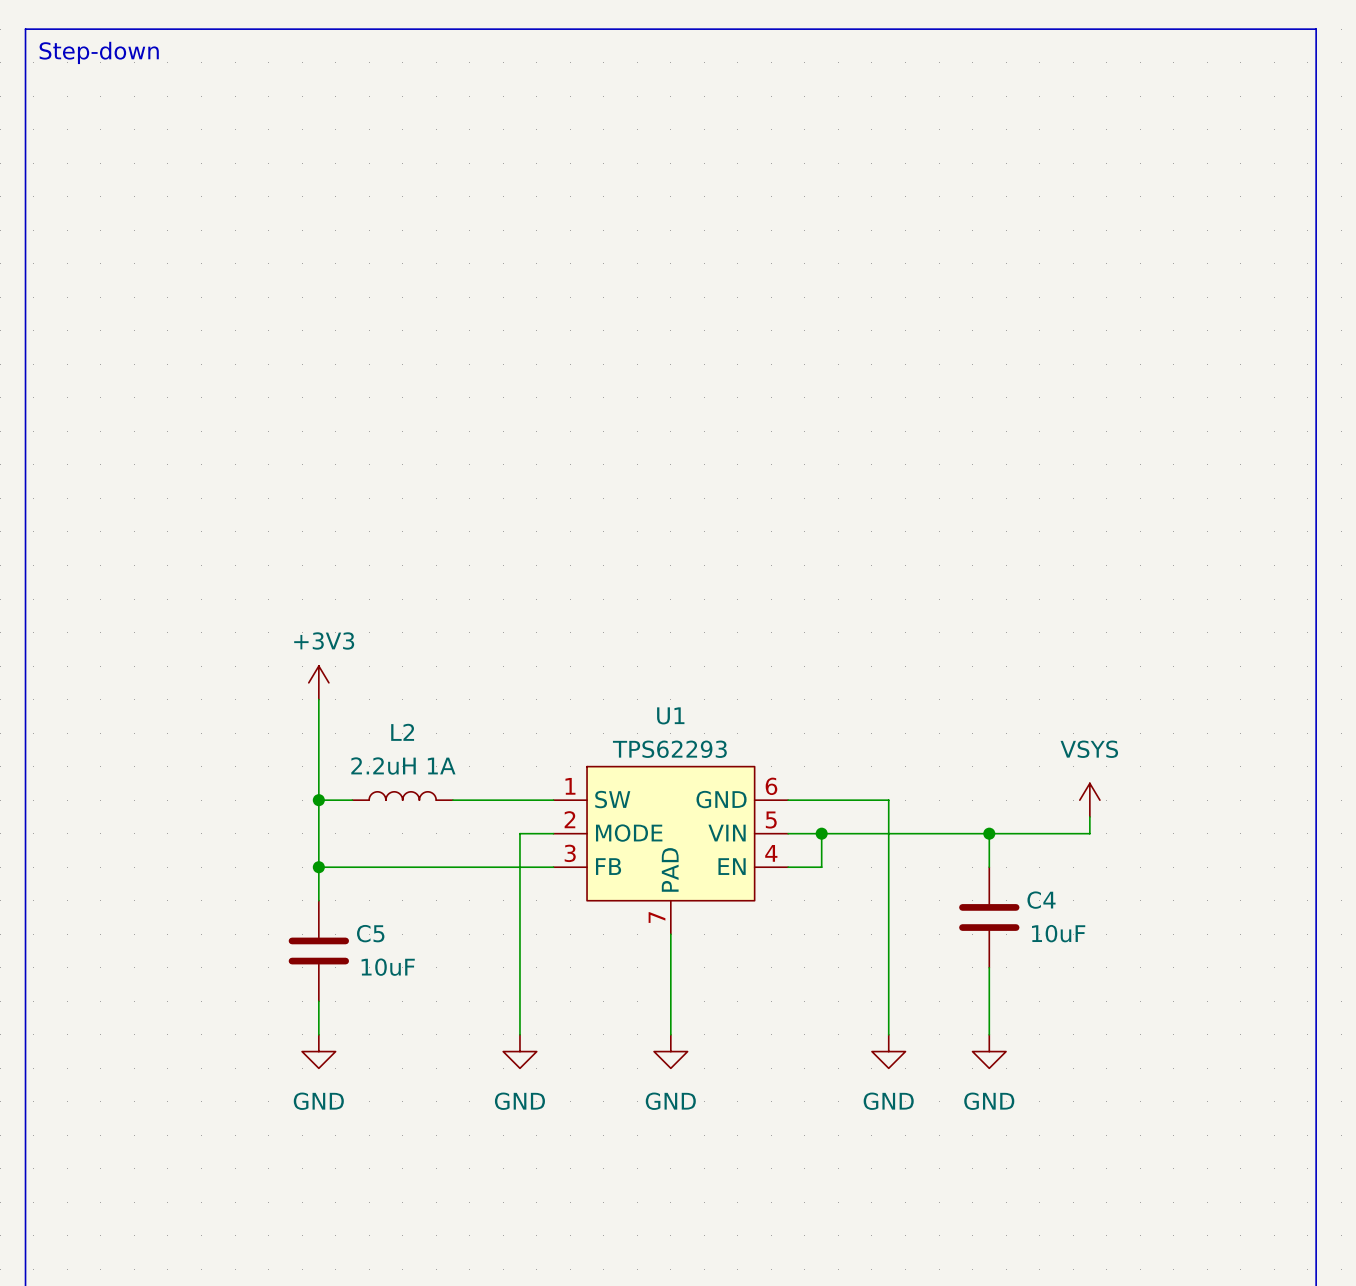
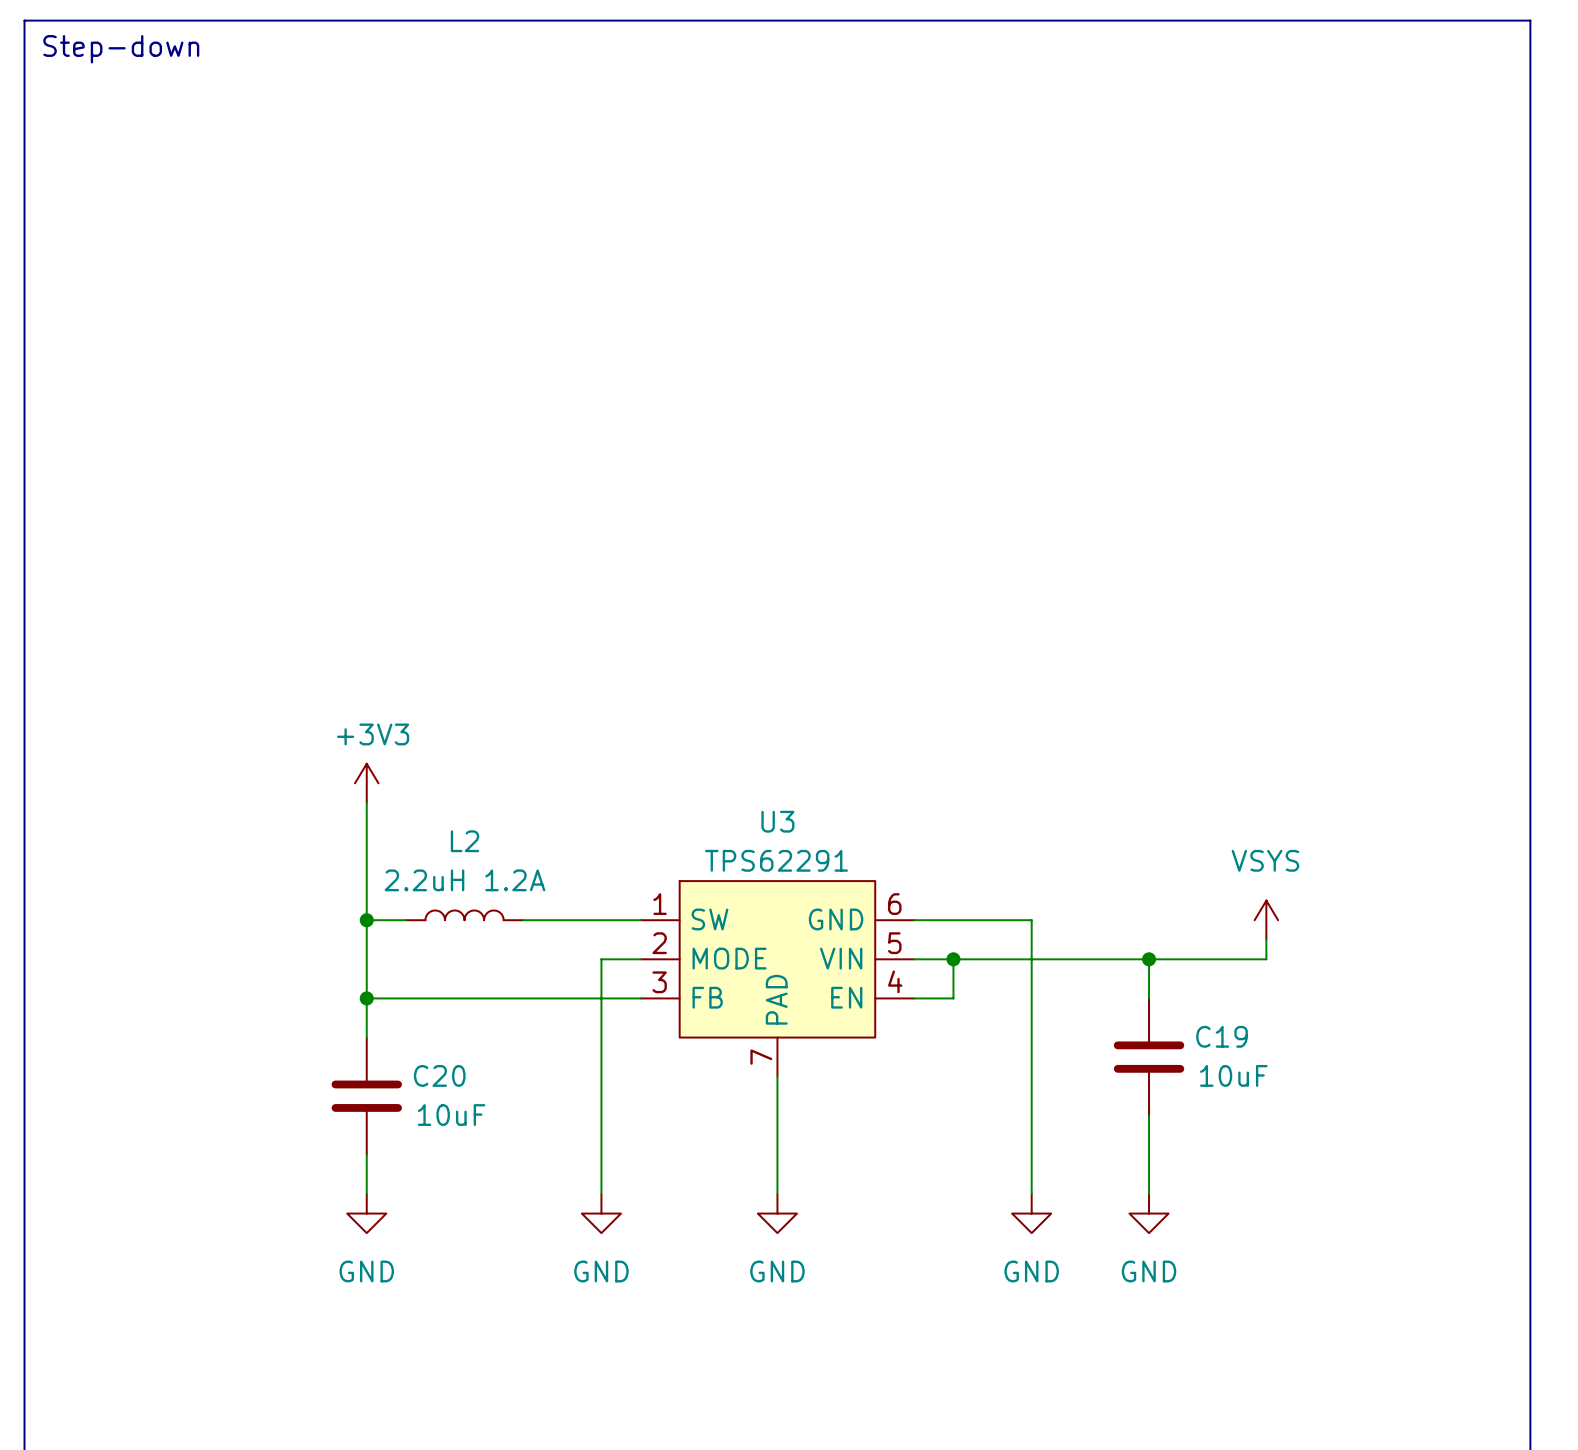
U1 name: U1 (670, 715) -> U3 (777, 821)
U1 value: TPS62293 (669, 749) -> TPS62291 (776, 860)
L2 value: 2.2uH 1A (403, 766) -> 2.2uH 1.2A (465, 880)
C4 name: C4 (1041, 900) -> C19 (1222, 1036)
C5 name: C5 (370, 933) -> C20 (439, 1075)

